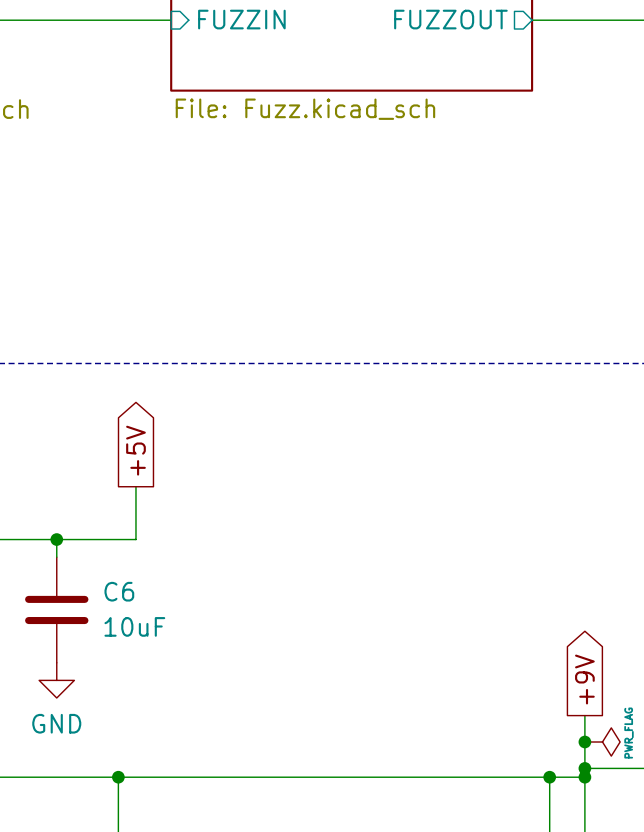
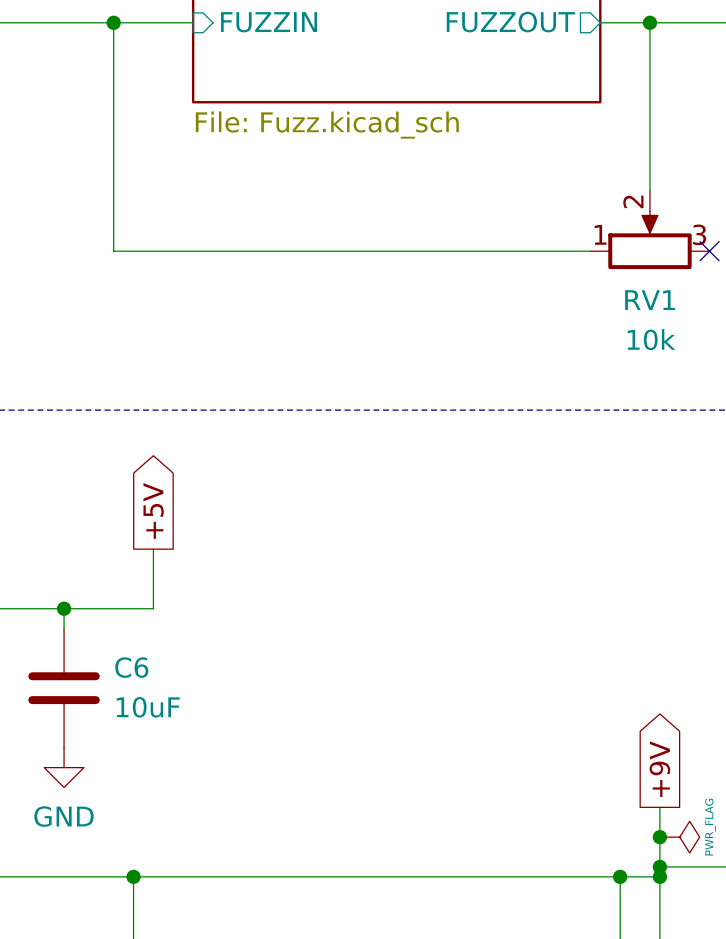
wire: none -> (113, 22) (113, 251) (590, 251)
junction: none -> (113, 22)
wire: none -> (649, 22) (649, 191)
junction: none -> (649, 22)
RV1: none -> 10k (649, 230)
no-connect mark: none -> (709, 251)

